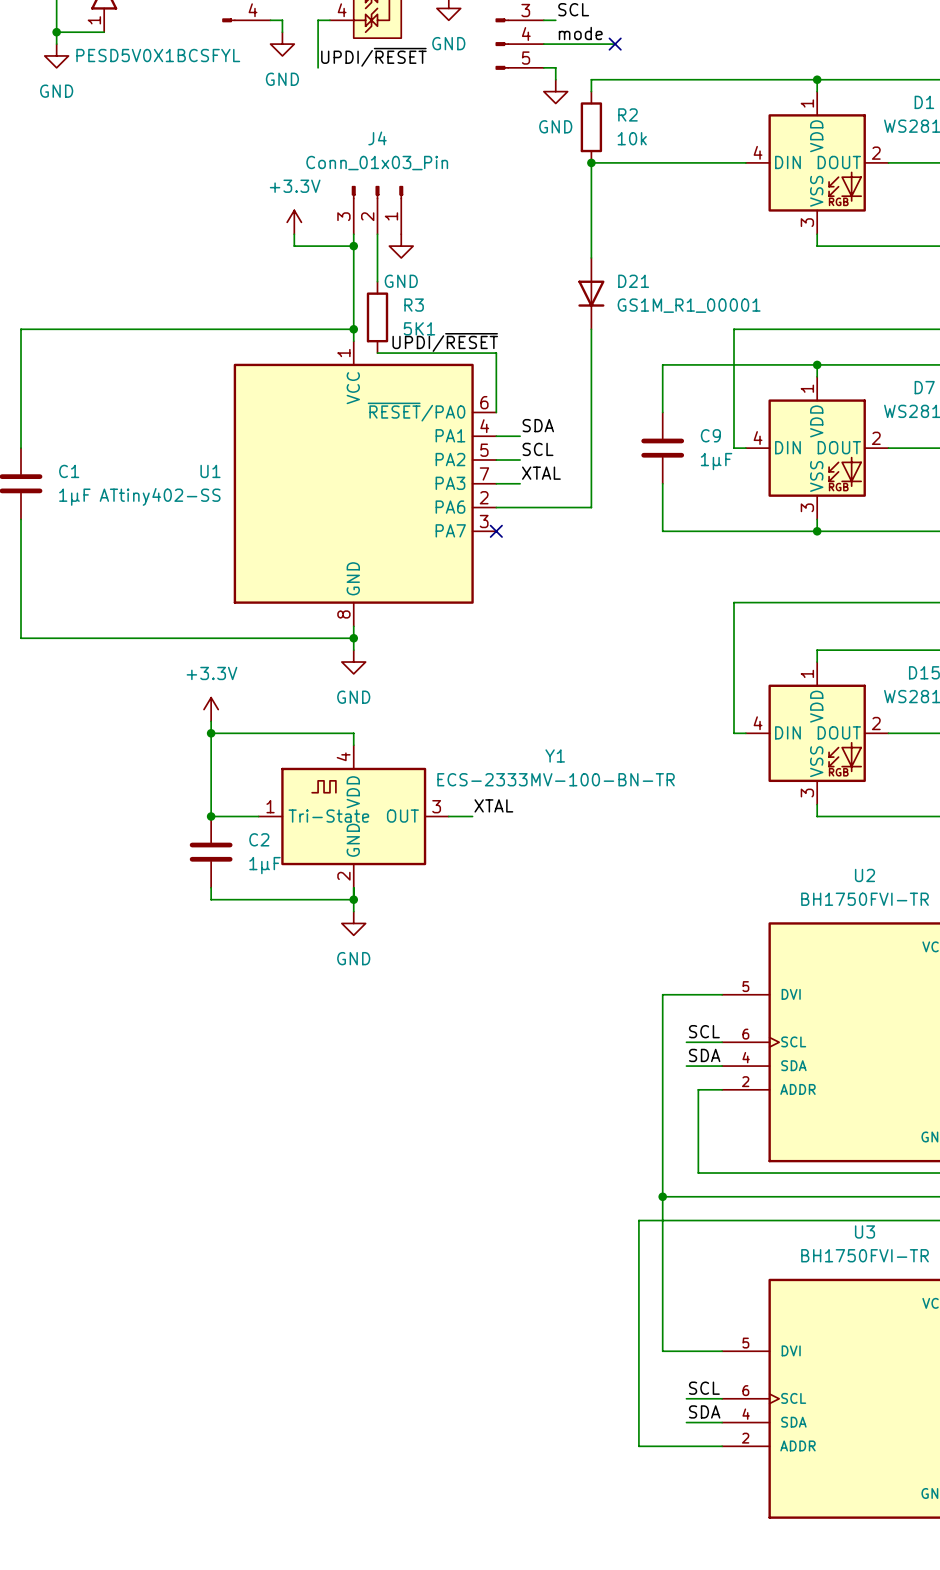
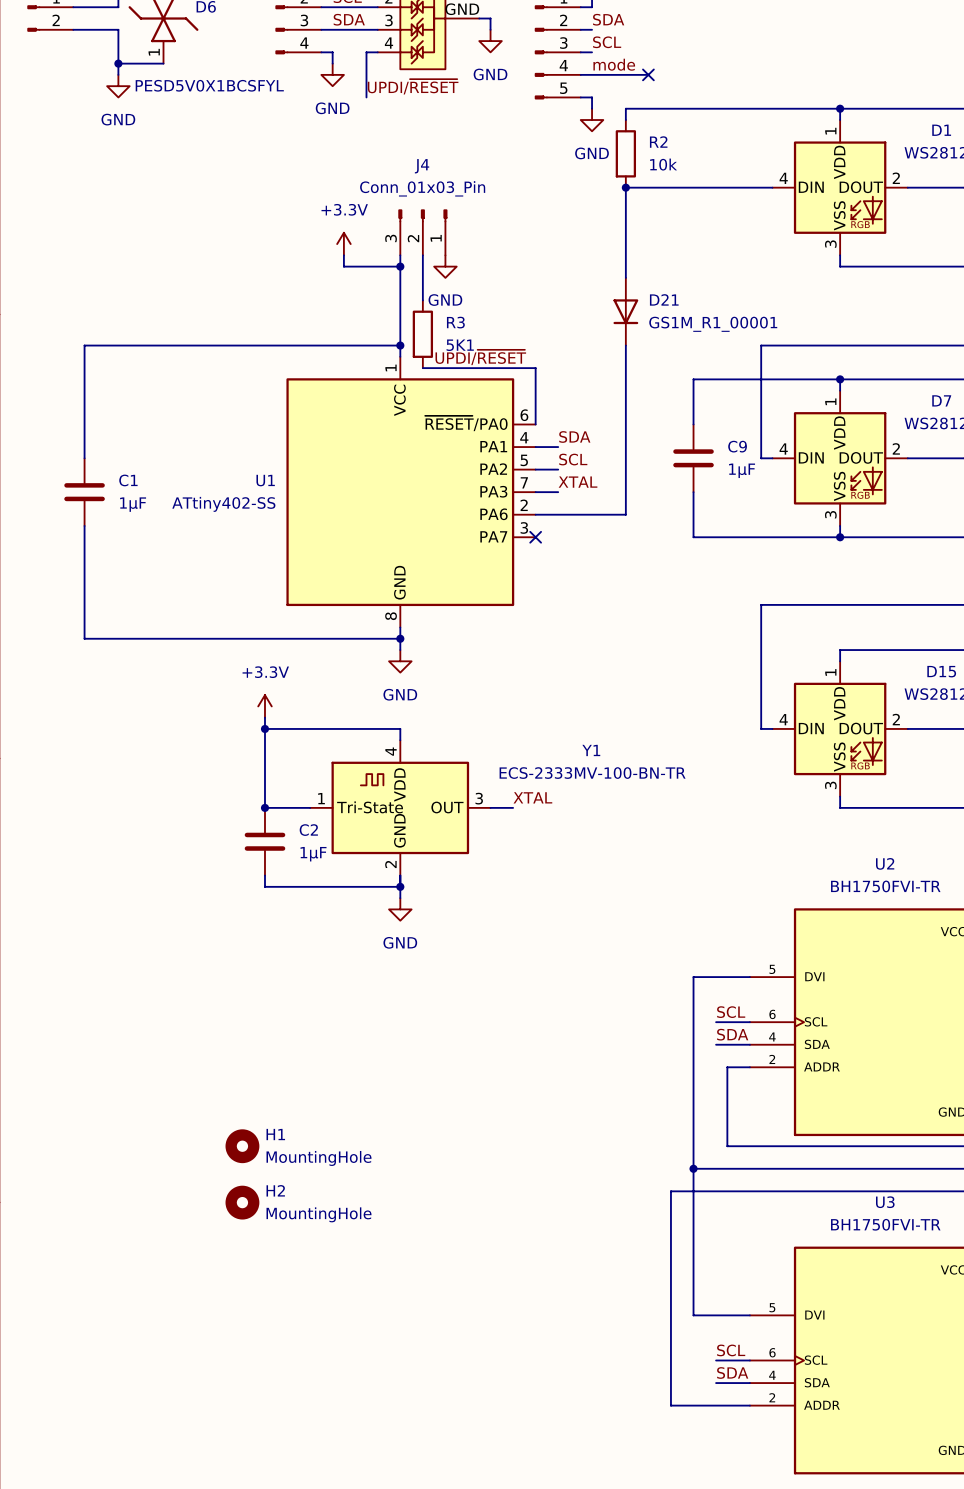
H1: none -> MountingHole (242, 1146)
H2: none -> MountingHole (242, 1202)

